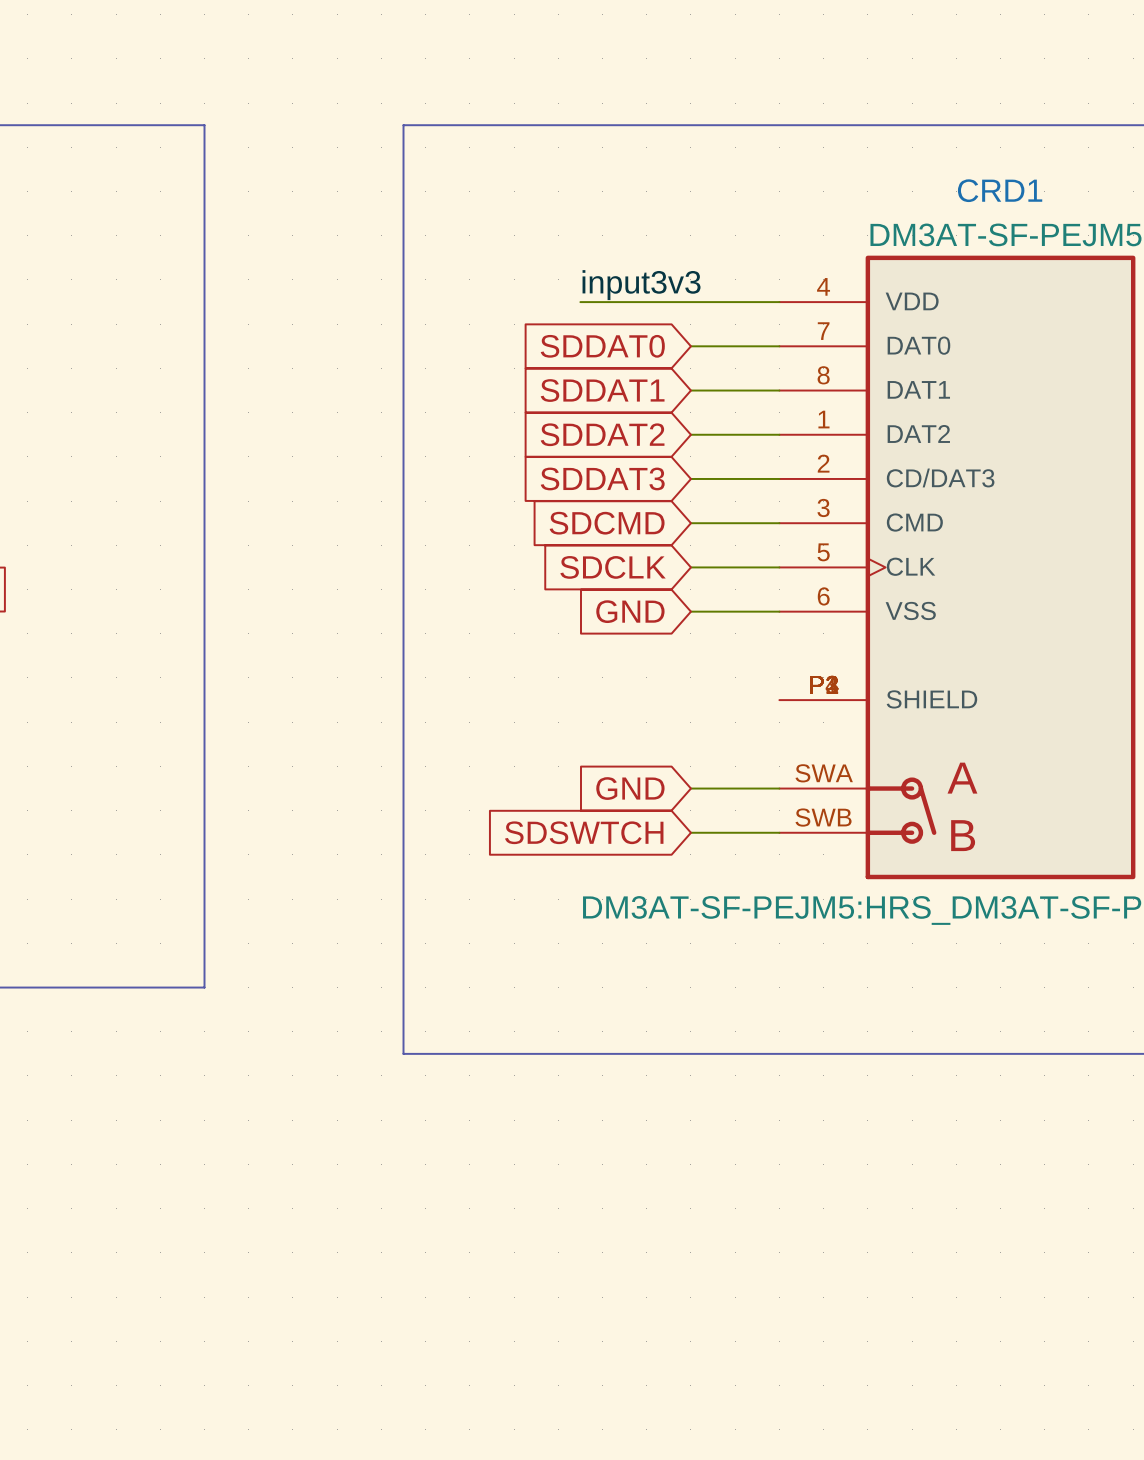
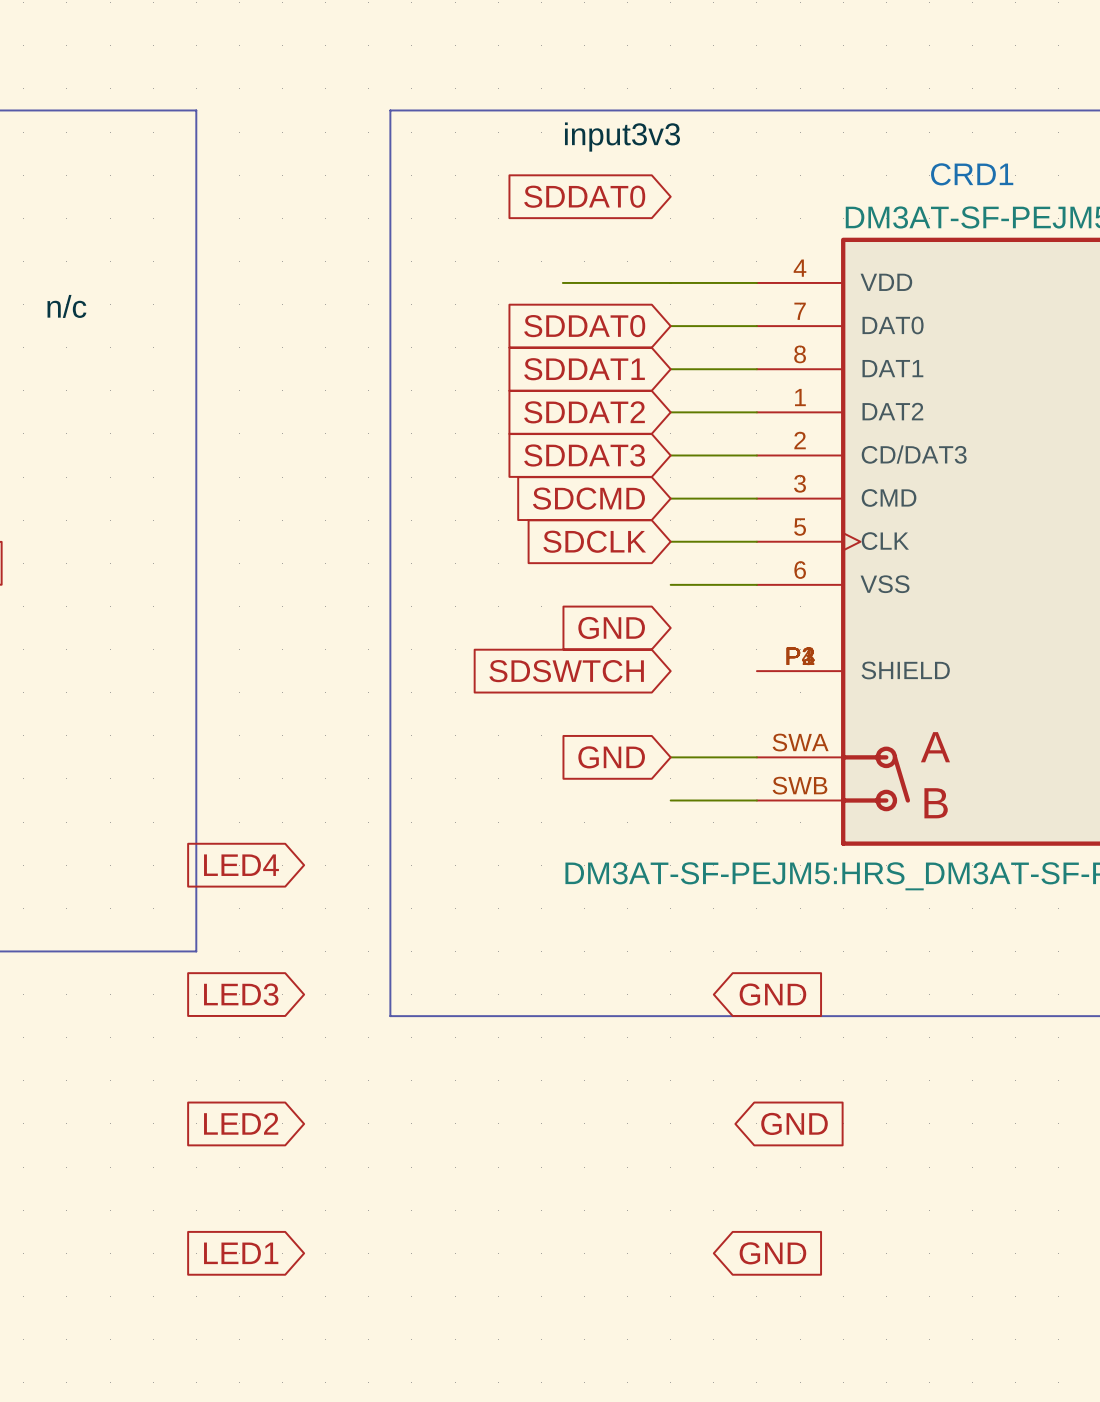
global label: none -> SDDAT0 (584, 196)
label position: input3v3 (641, 285) -> input3v3 (622, 137)
label: none -> n/c (66, 306)
global label position: GND (630, 611) -> GND (611, 627)
global label position: SDSWTCH (584, 832) -> SDSWTCH (566, 671)
global label: none -> LED4 (241, 865)
global label: none -> LED3 (241, 994)
global label: none -> GND (772, 994)
global label: none -> LED2 (241, 1123)
global label: none -> GND (794, 1123)
global label: none -> LED1 (241, 1253)
global label: none -> GND (772, 1253)

